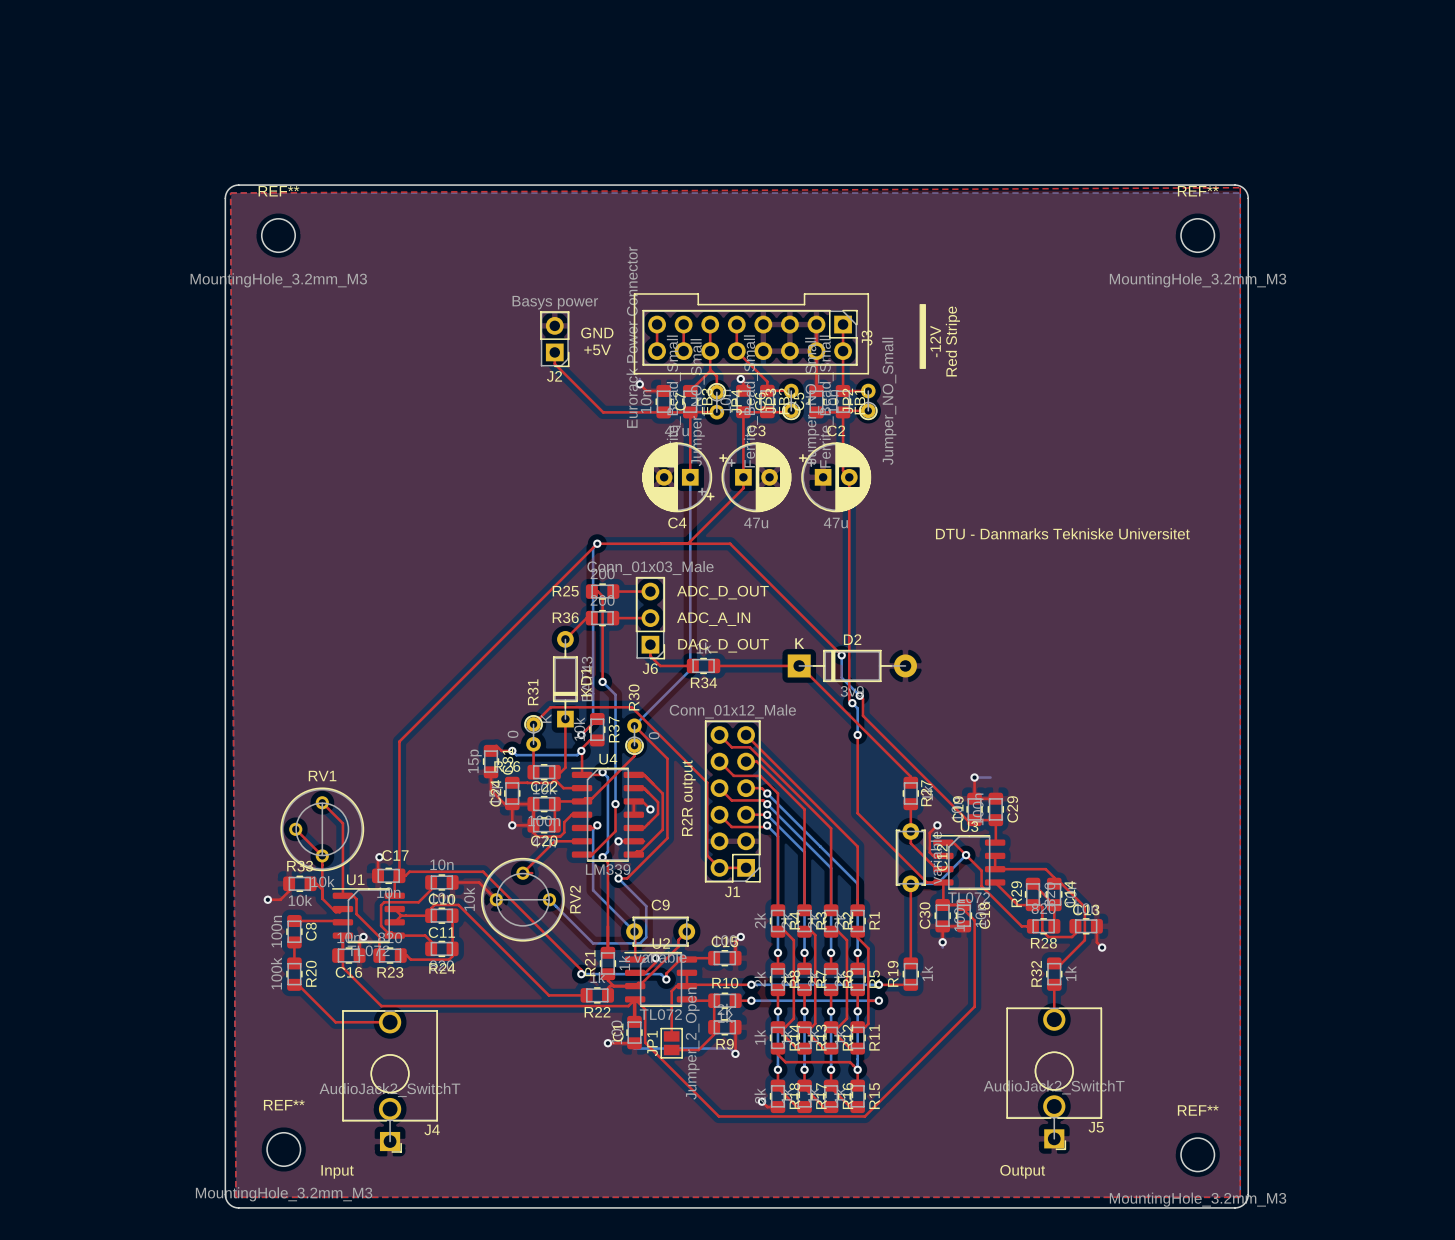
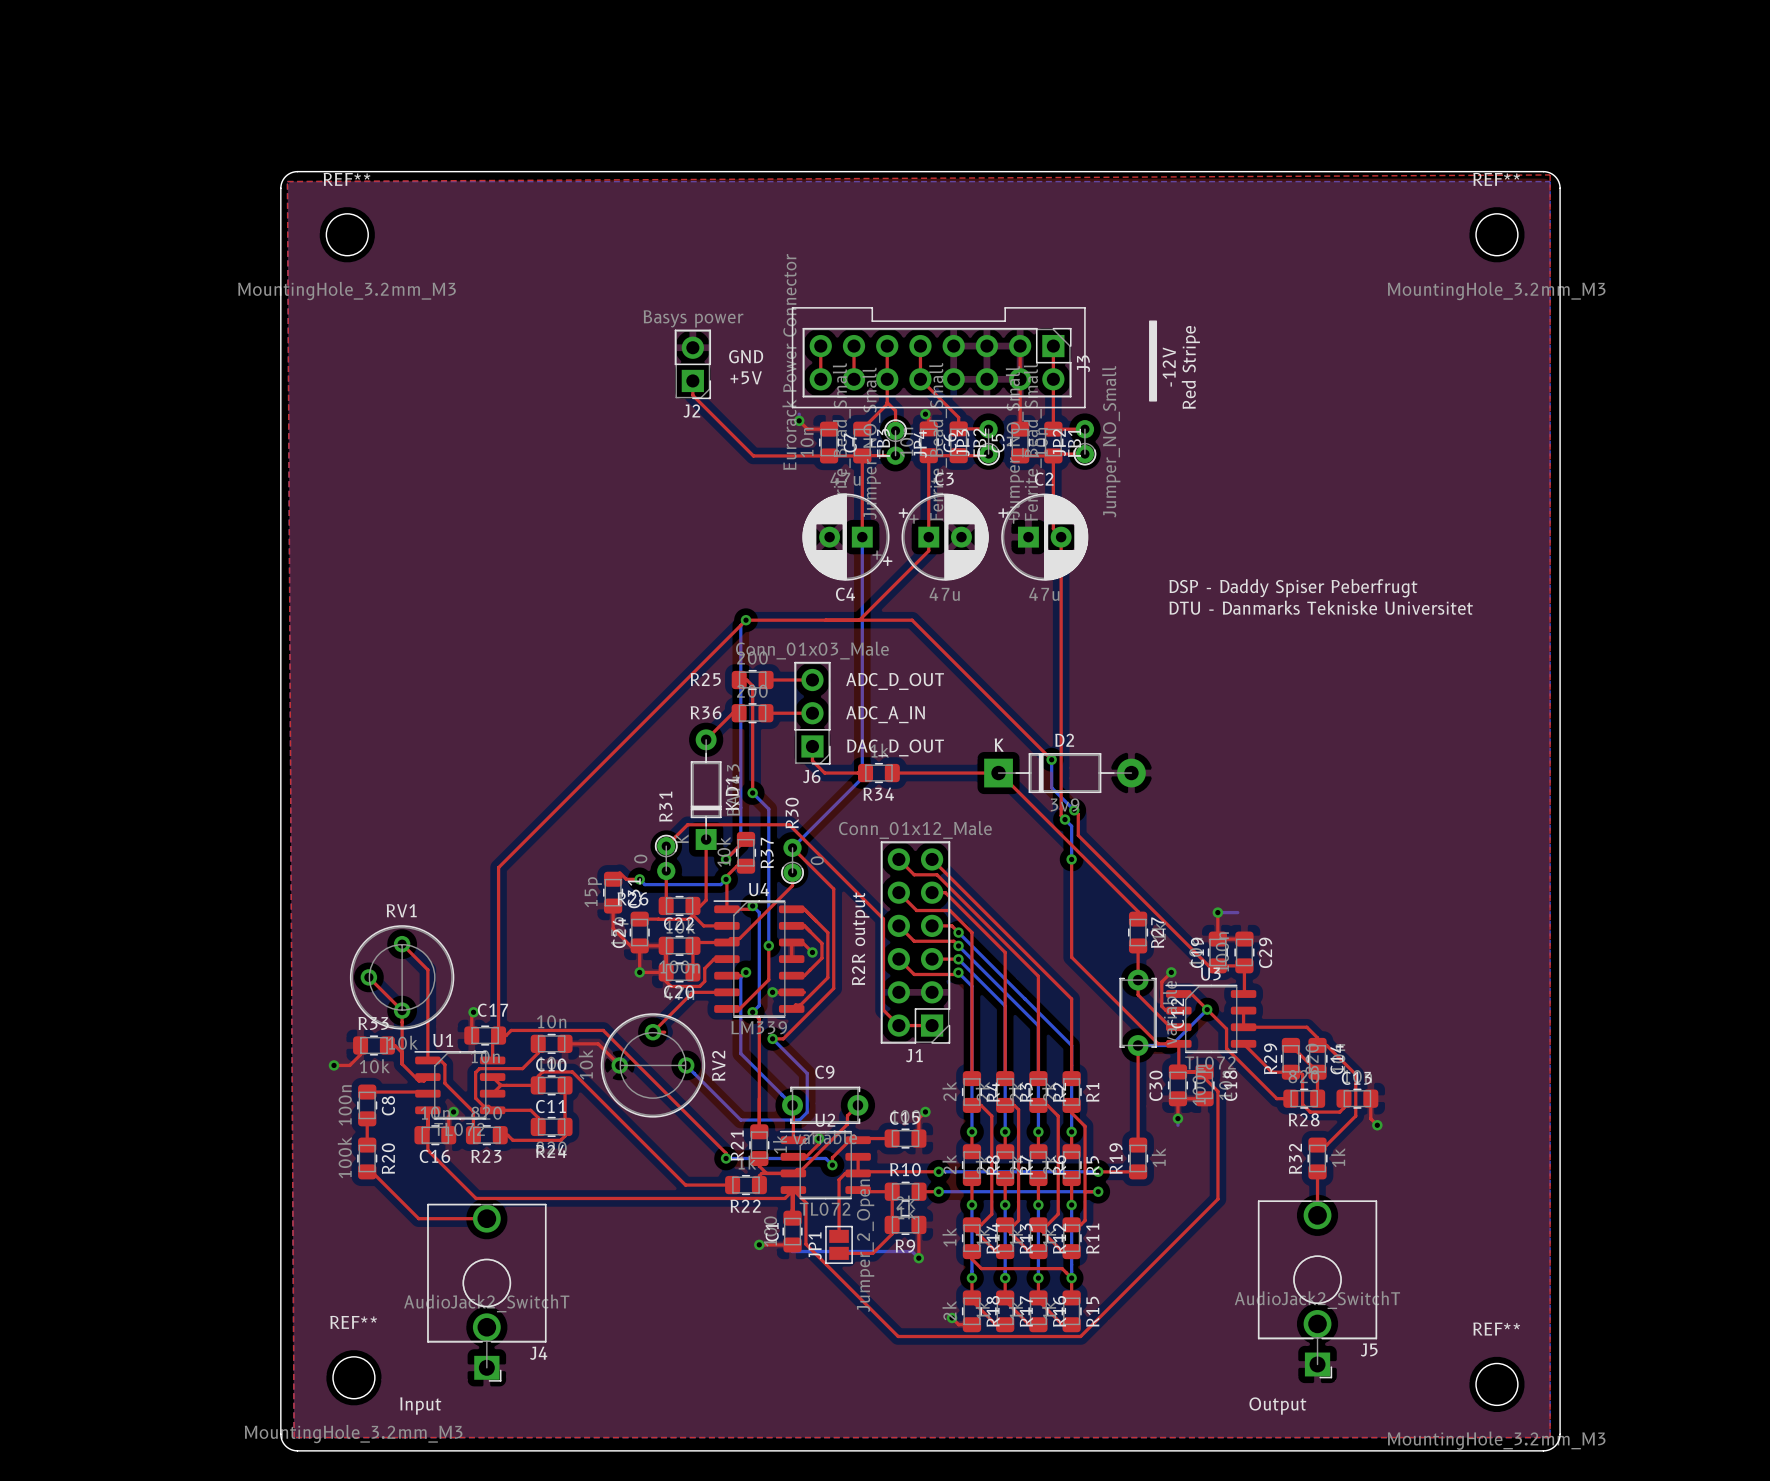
text: none -> DSP - Daddy Spiser Peberfrugt (1293, 588)

